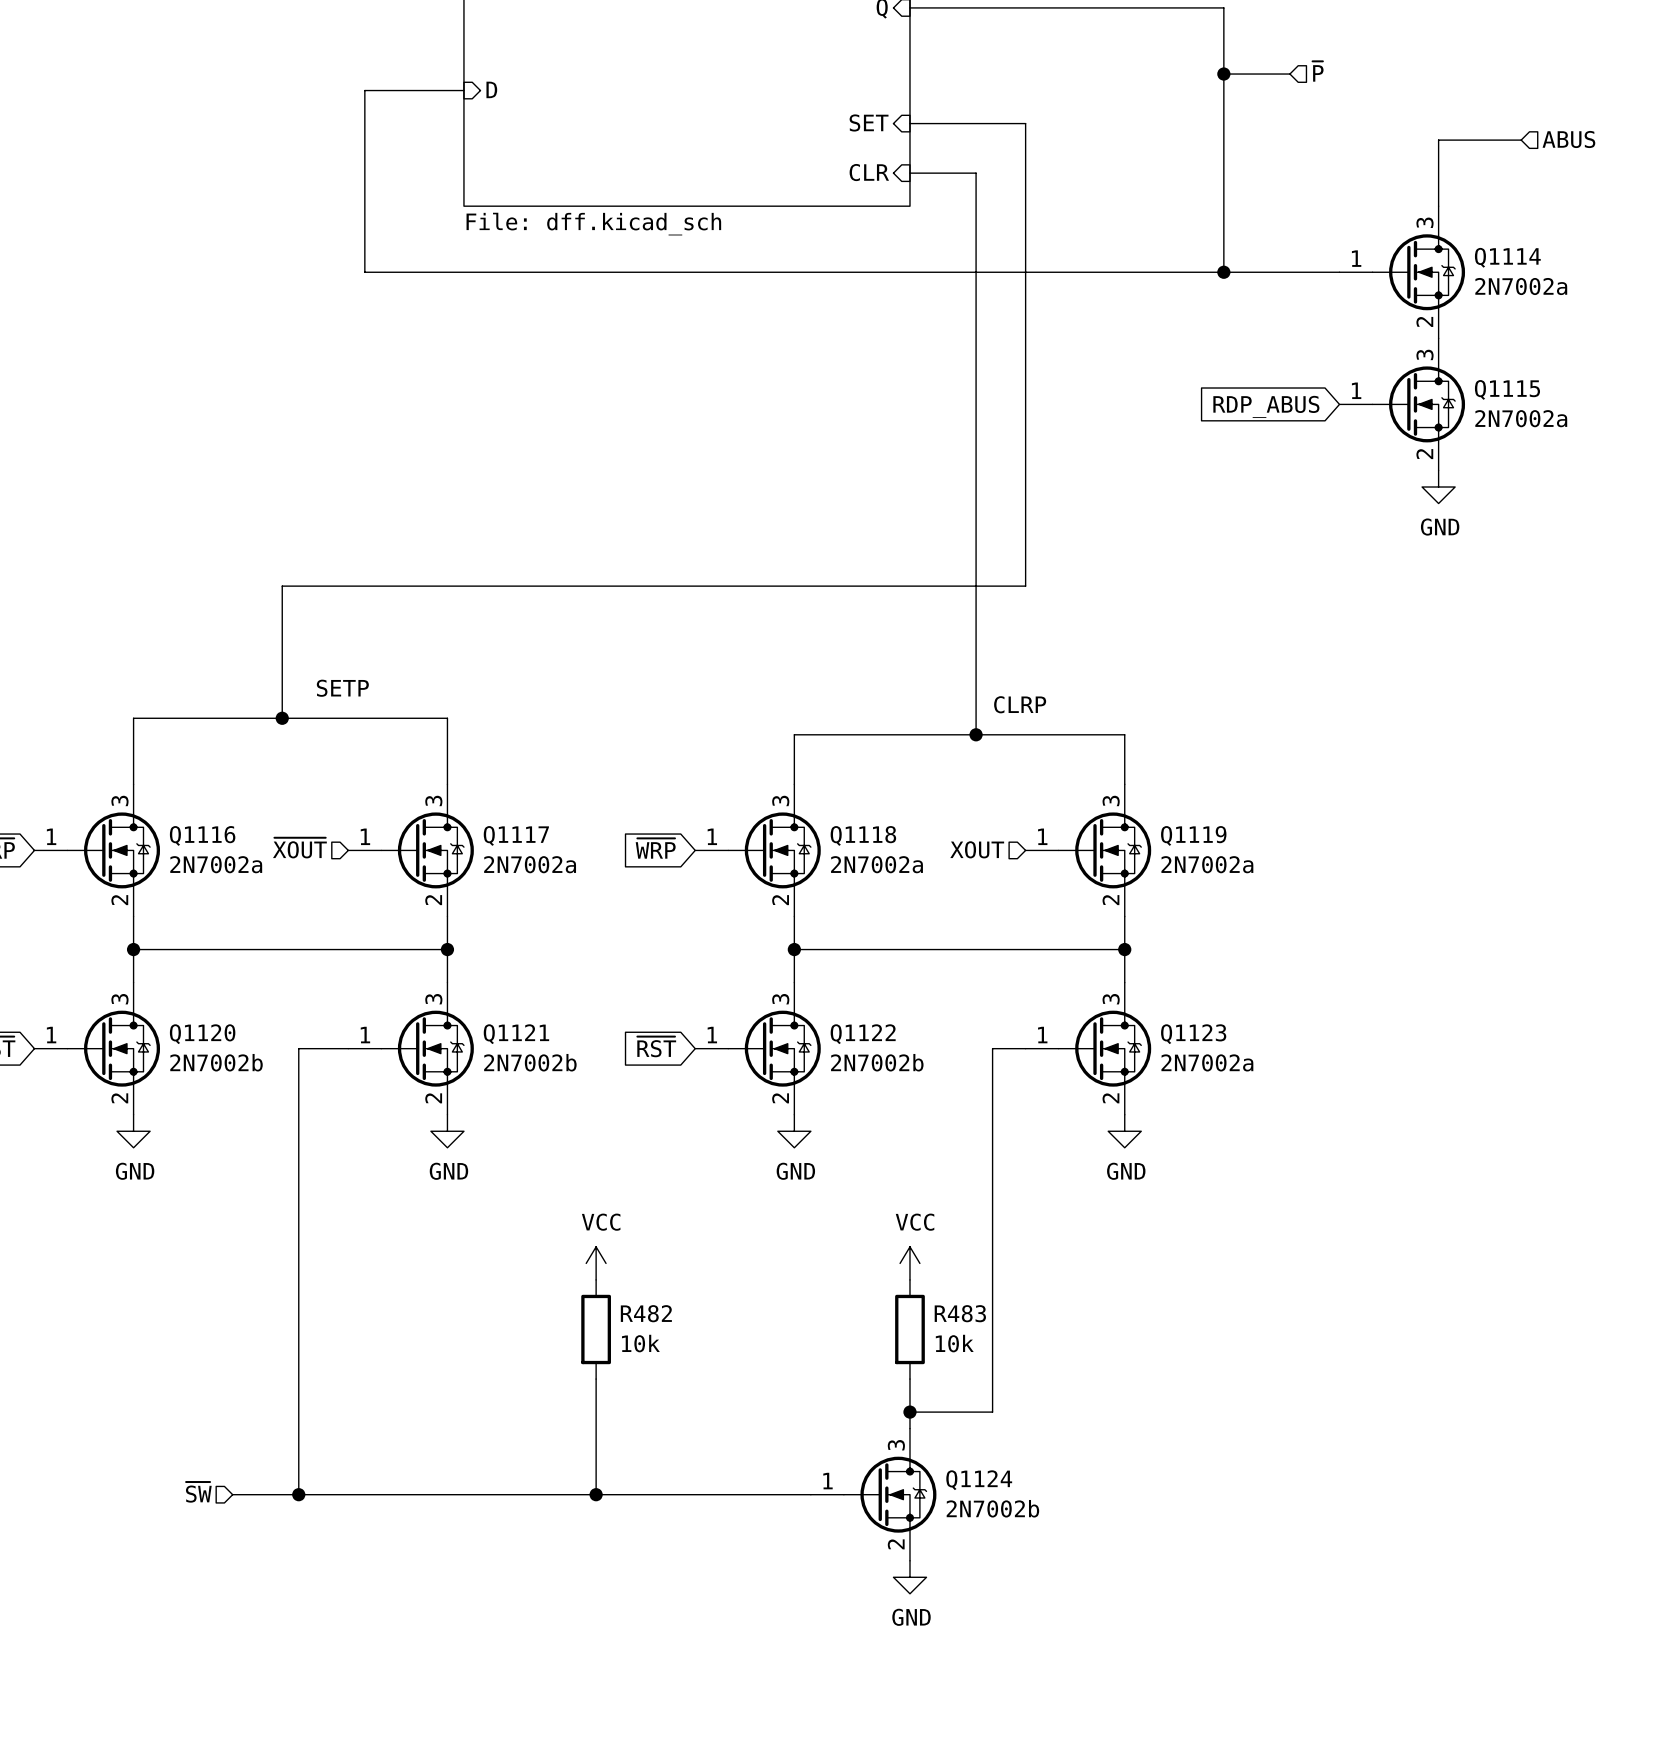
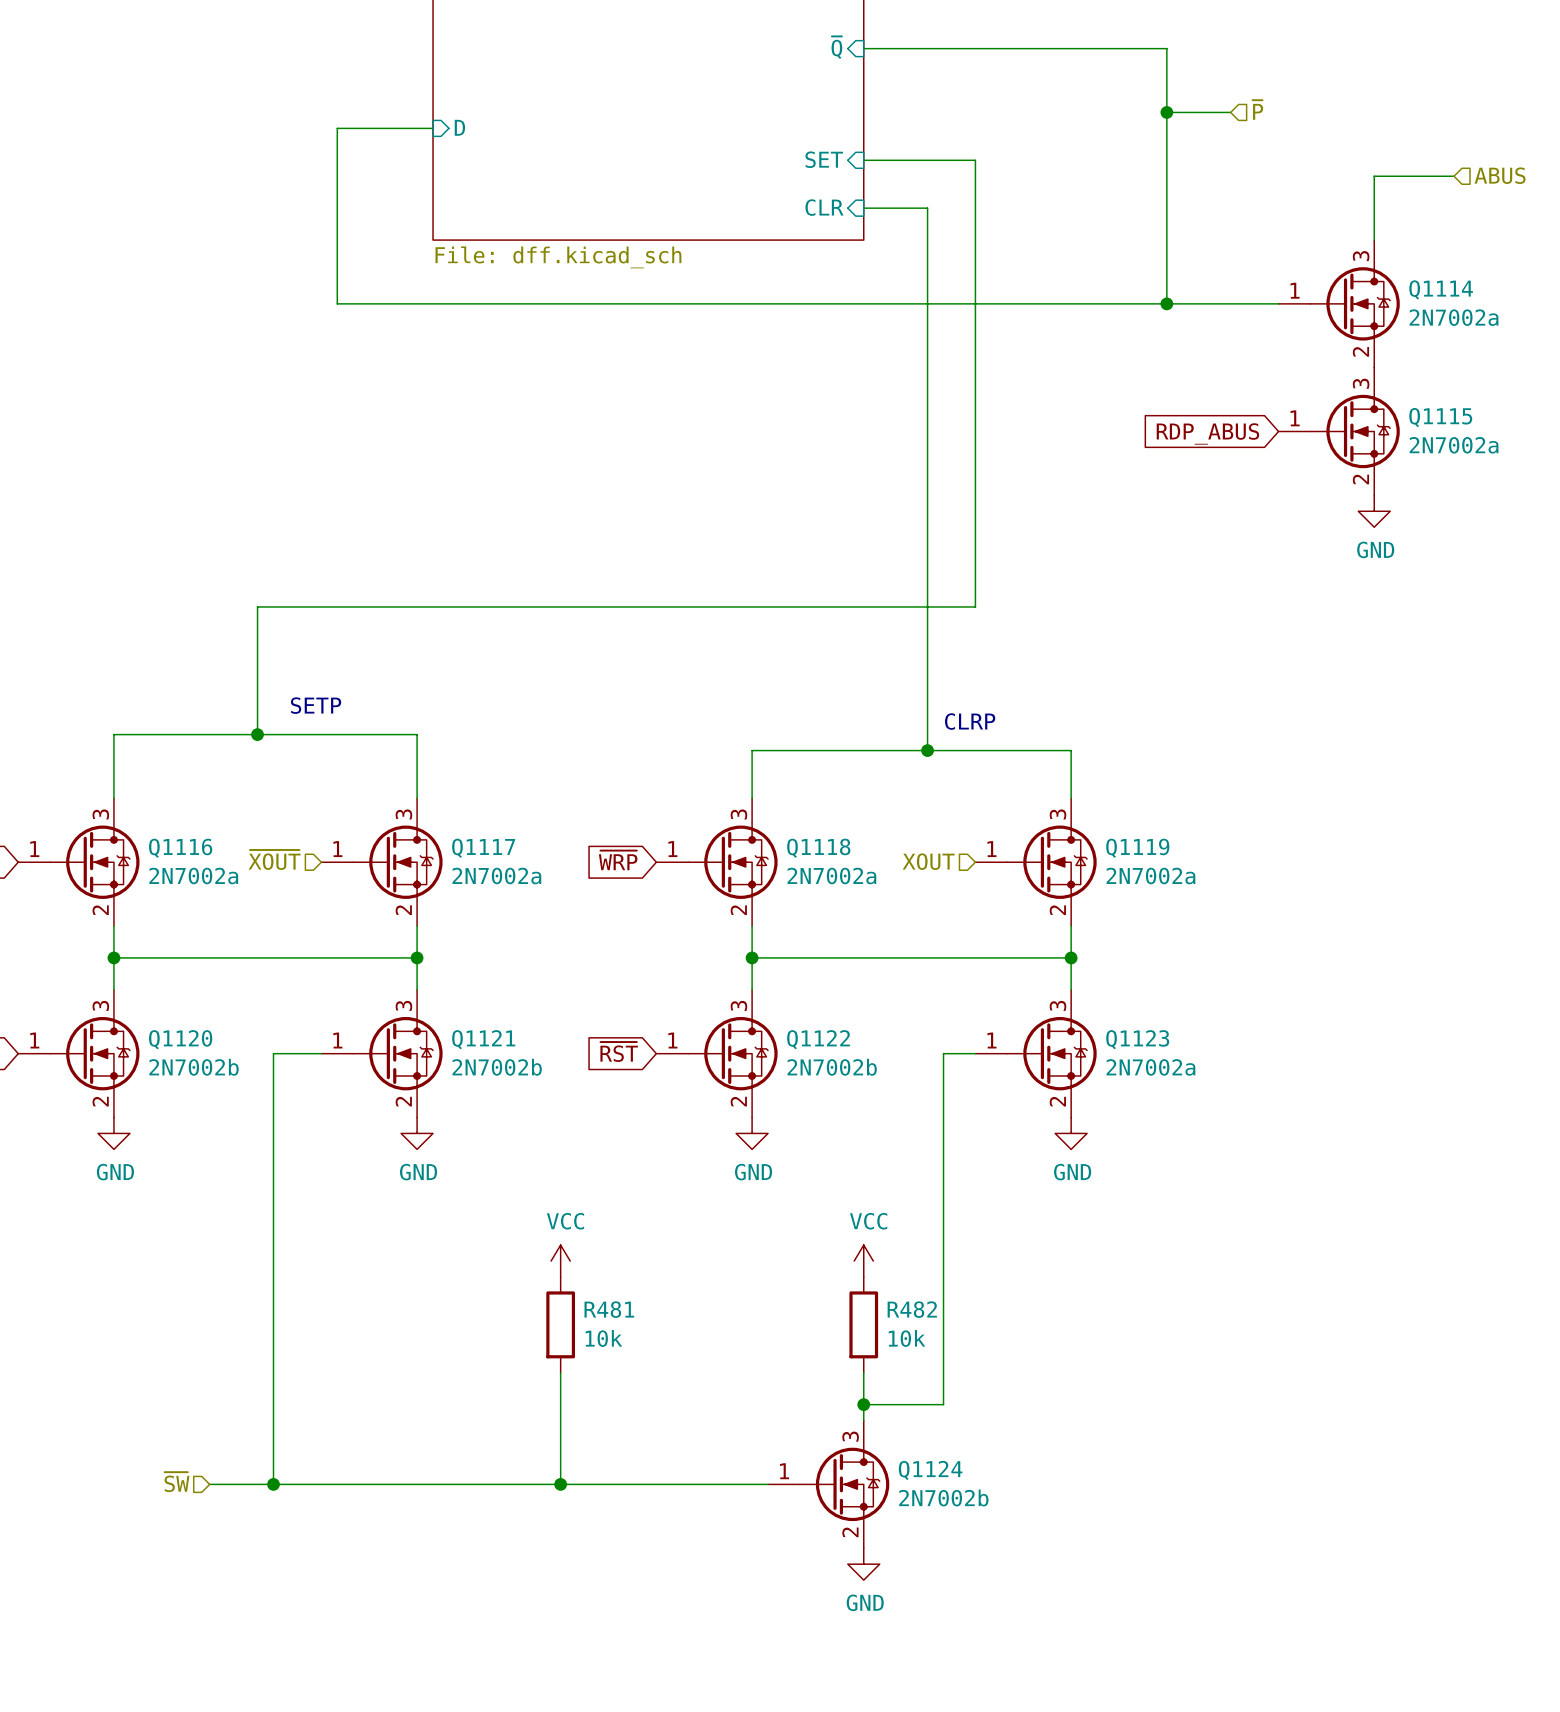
R482 name: R482 (646, 1313) -> R481 (609, 1309)
R483 name: R483 (960, 1313) -> R482 (912, 1309)

